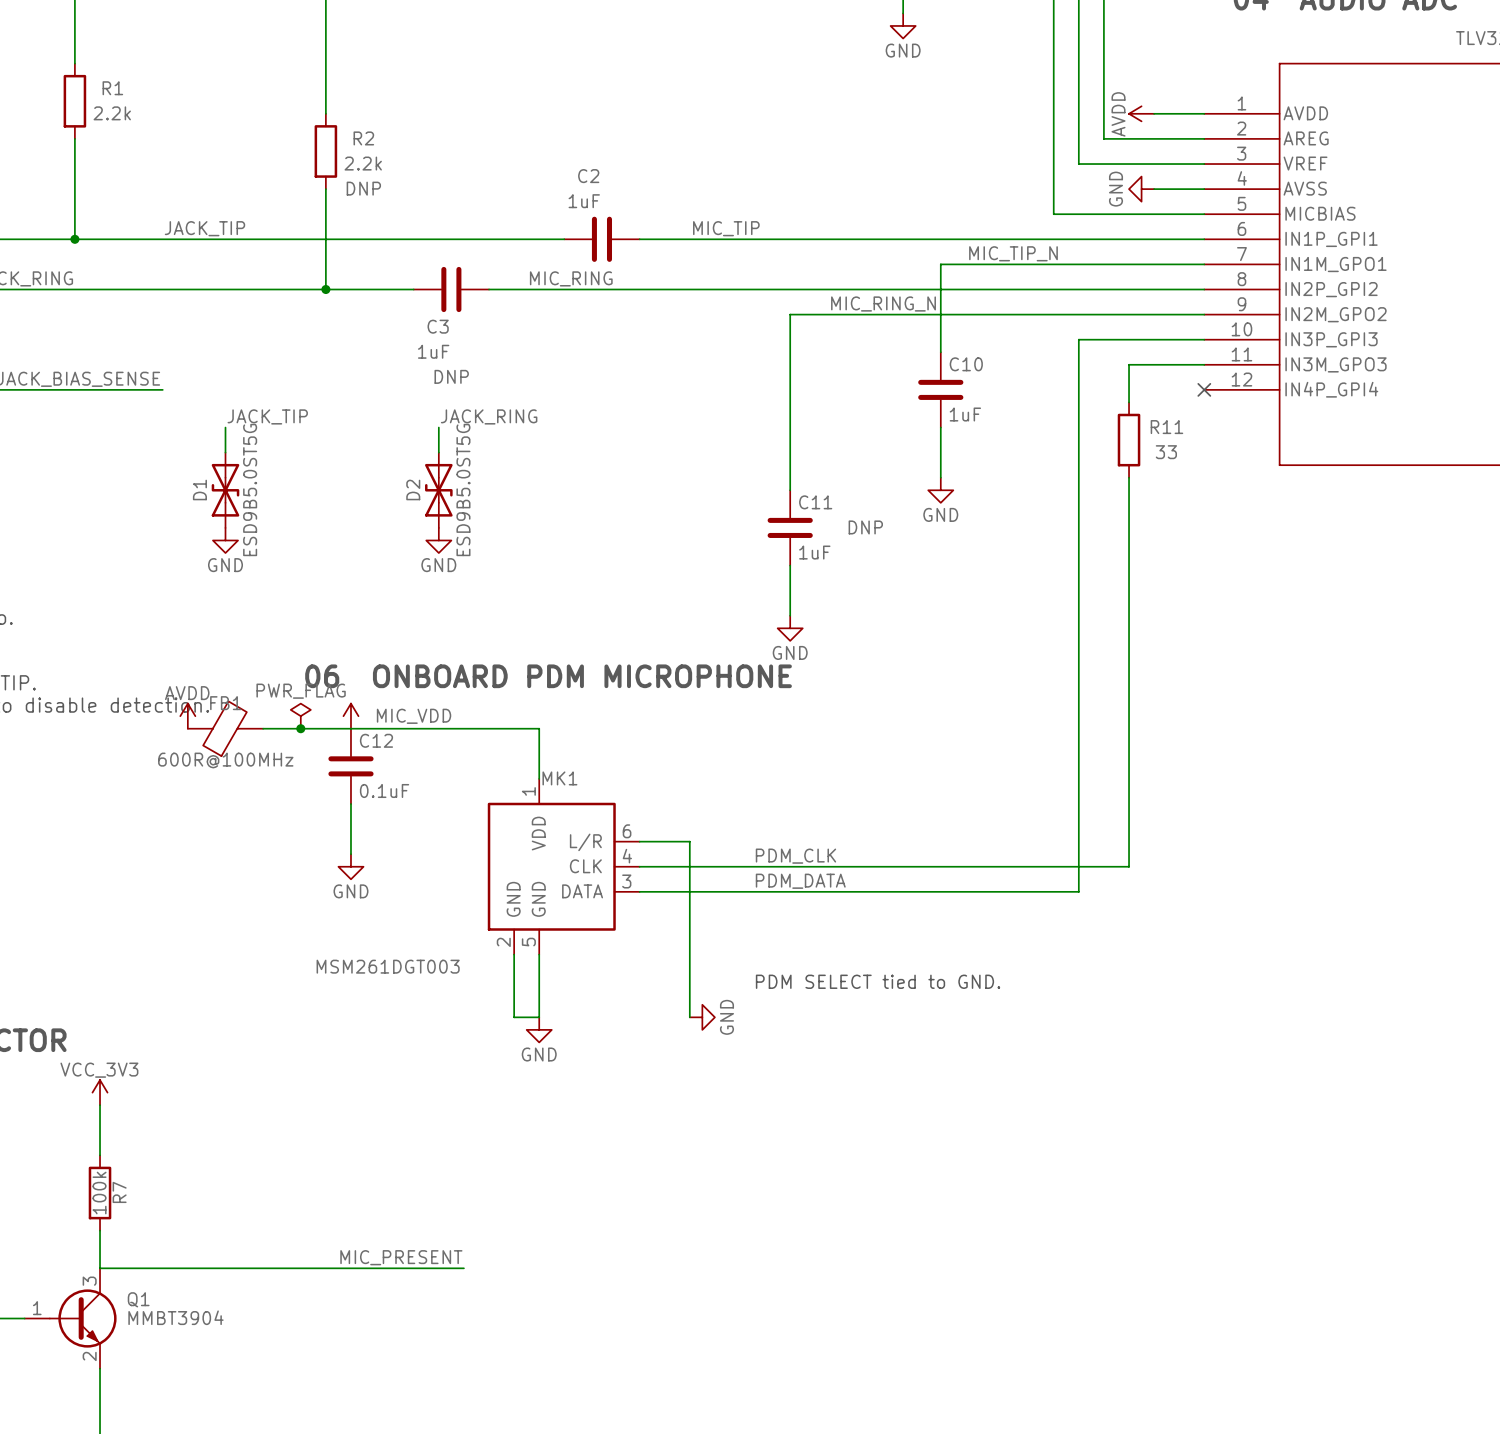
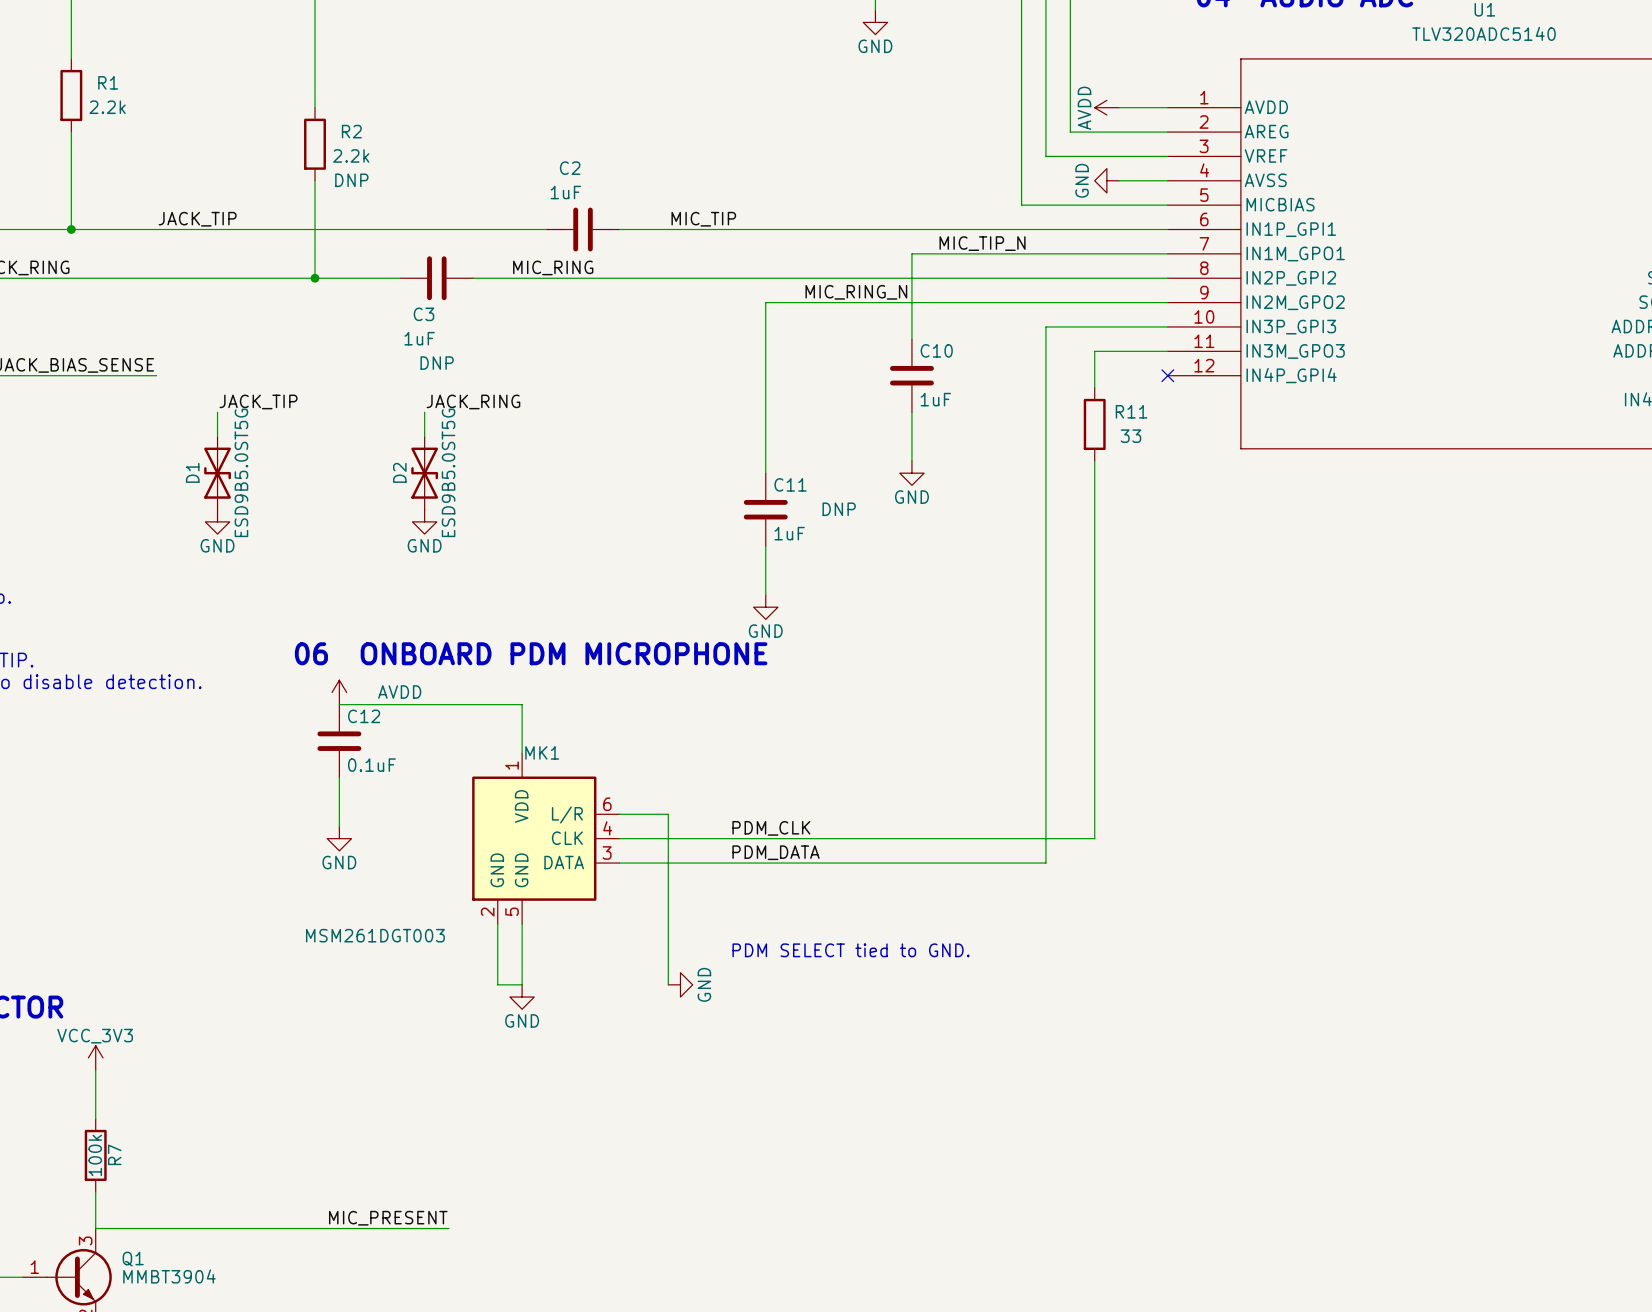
power symbol: AVDD (187, 716) -> none
power symbol: PWR_FLAG (300, 716) -> none
power symbol: MIC_VDD (350, 716) -> AVDD (339, 692)
FB1: 600R@100MHz (225, 728) -> none
wire: (263, 728) (350, 728) -> none
junction: (300, 728) -> none

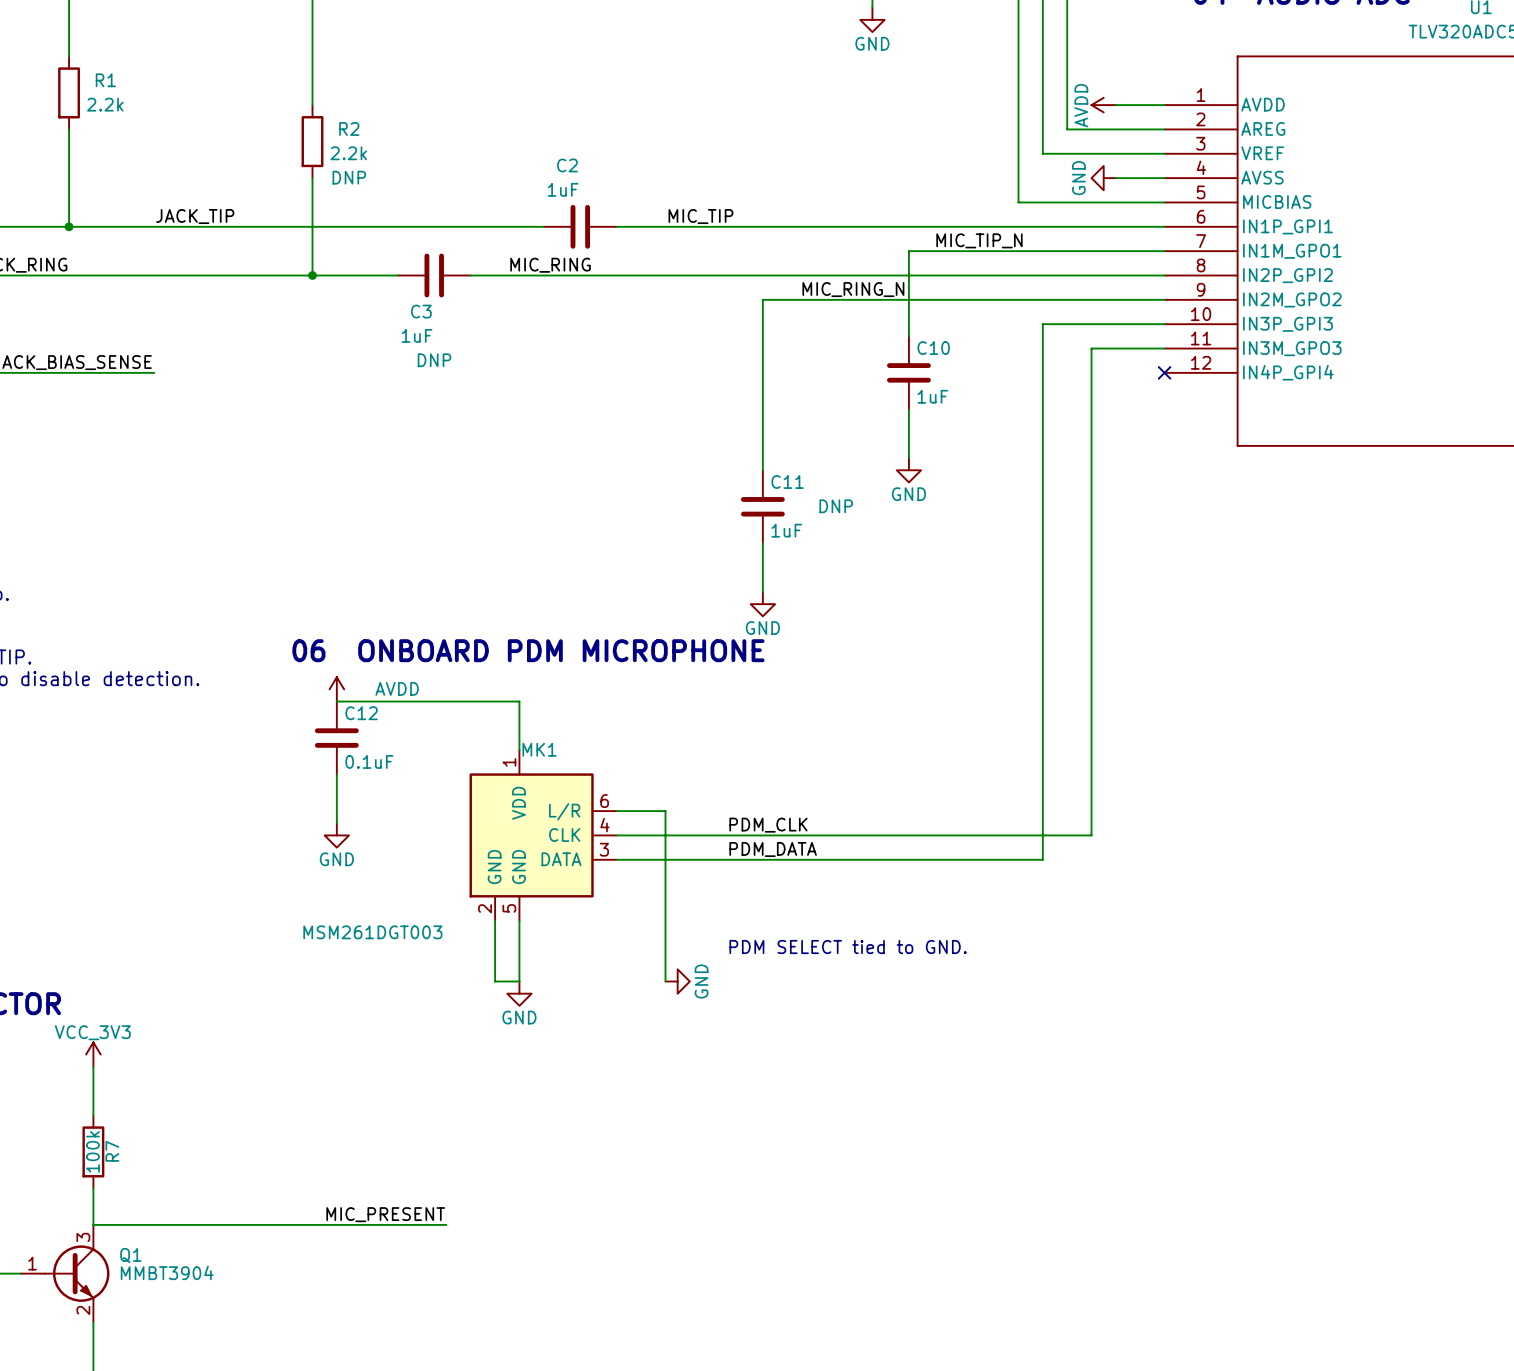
wire: none -> (1091, 385) (1091, 458)
label: JACK_TIP (258, 401) -> none
label: JACK_RING (473, 401) -> none
wire: (217, 412) (217, 436) -> none
wire: (424, 412) (424, 436) -> none
R11: 33 (1094, 424) -> none
D1: ESD9B5.0ST5G (217, 473) -> none
D2: ESD9B5.0ST5G (424, 473) -> none
power symbol: GND (217, 521) -> none
power symbol: GND (424, 521) -> none

